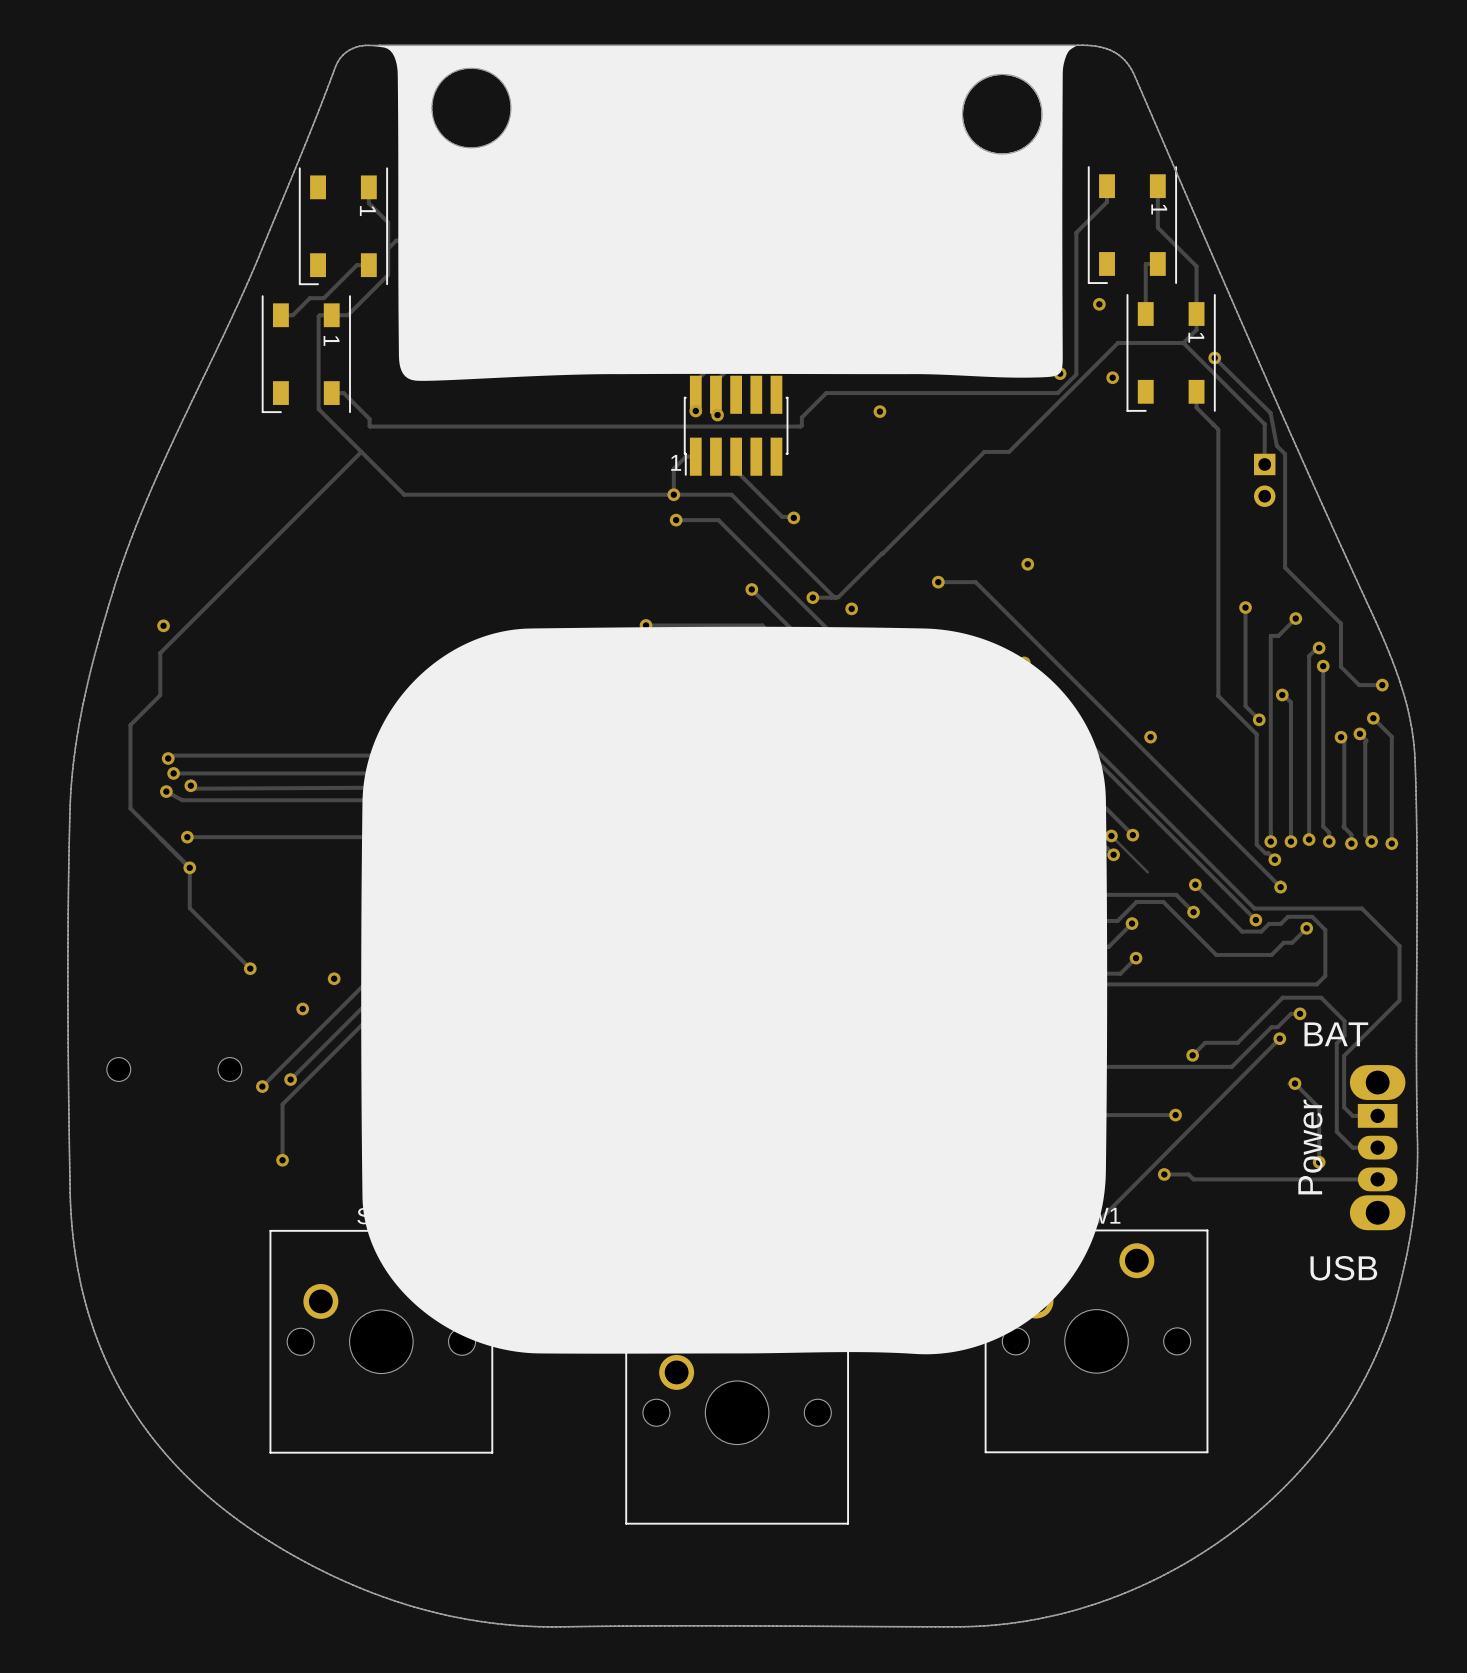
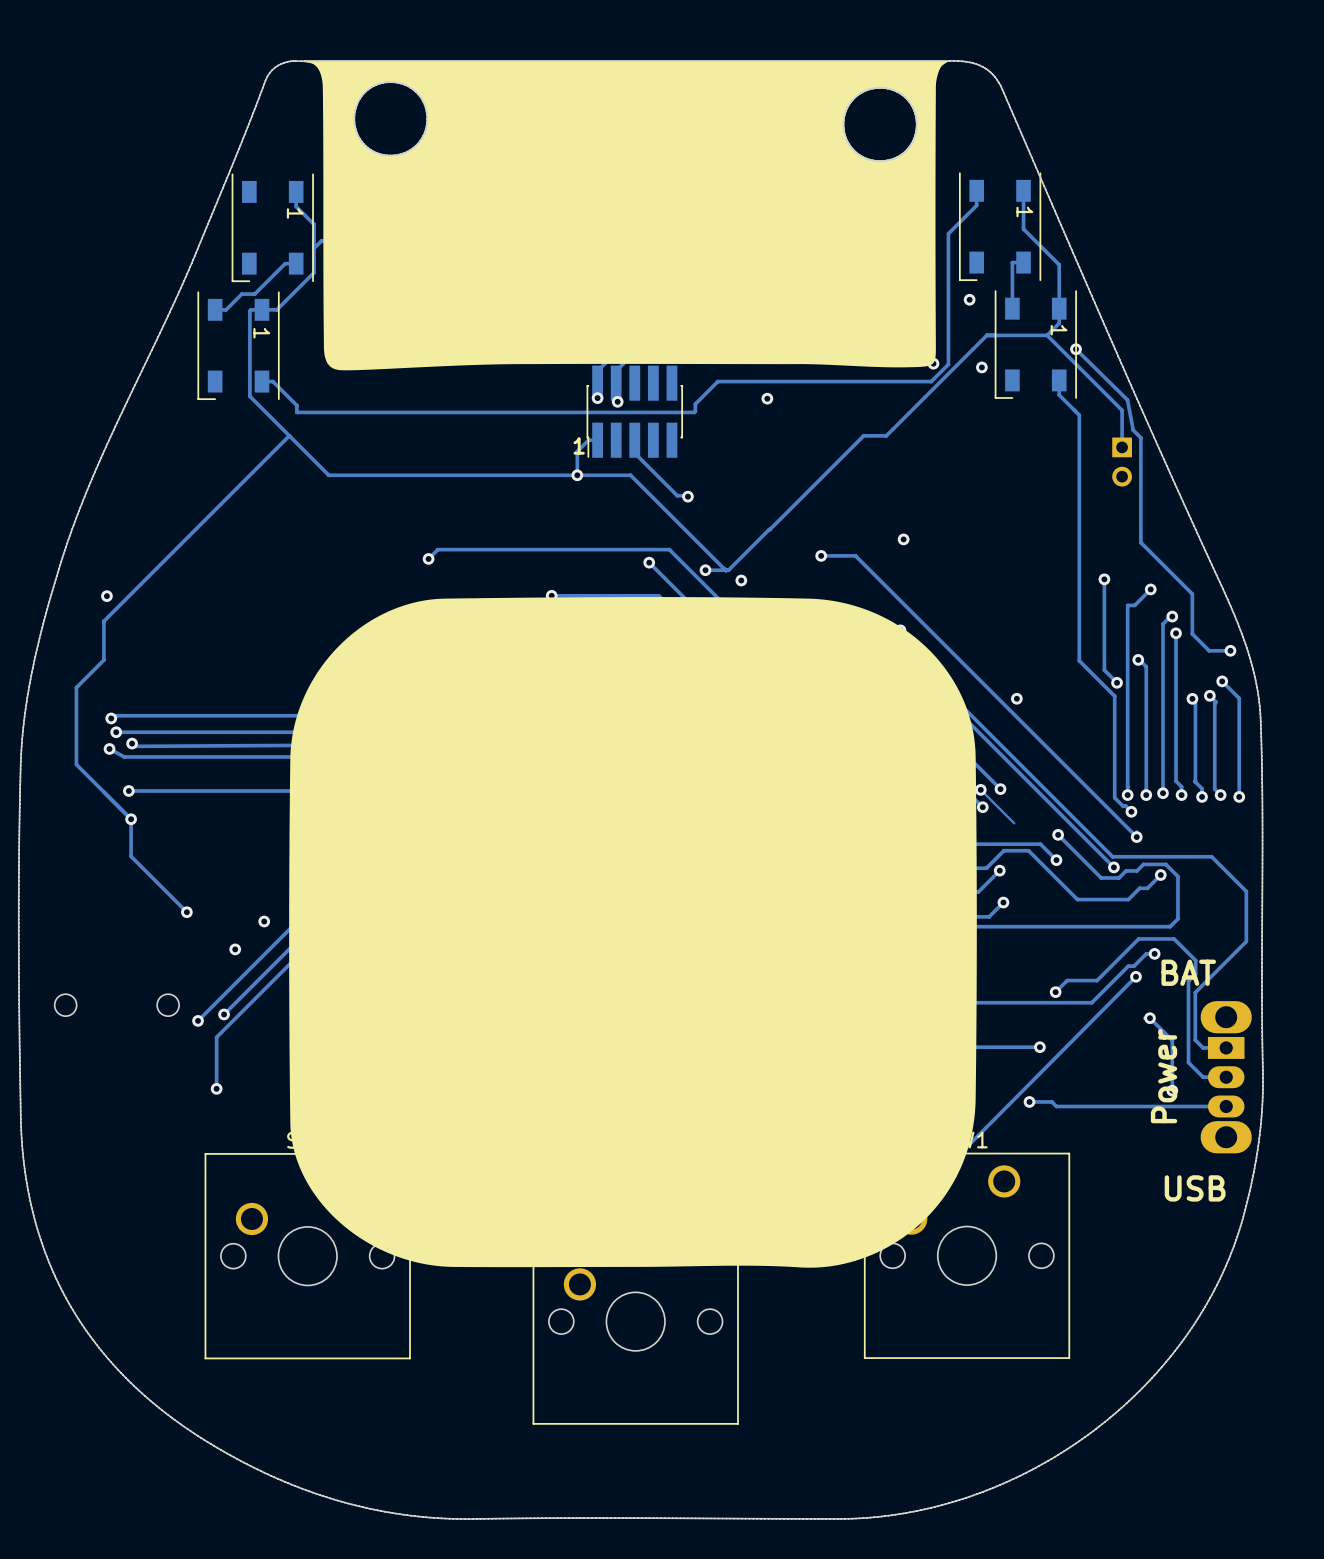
track: (676, 520) (718, 520) (773, 575) -> (428, 558) (437, 549) (669, 549)
via: (676, 520) -> none
via: none -> (428, 558)

